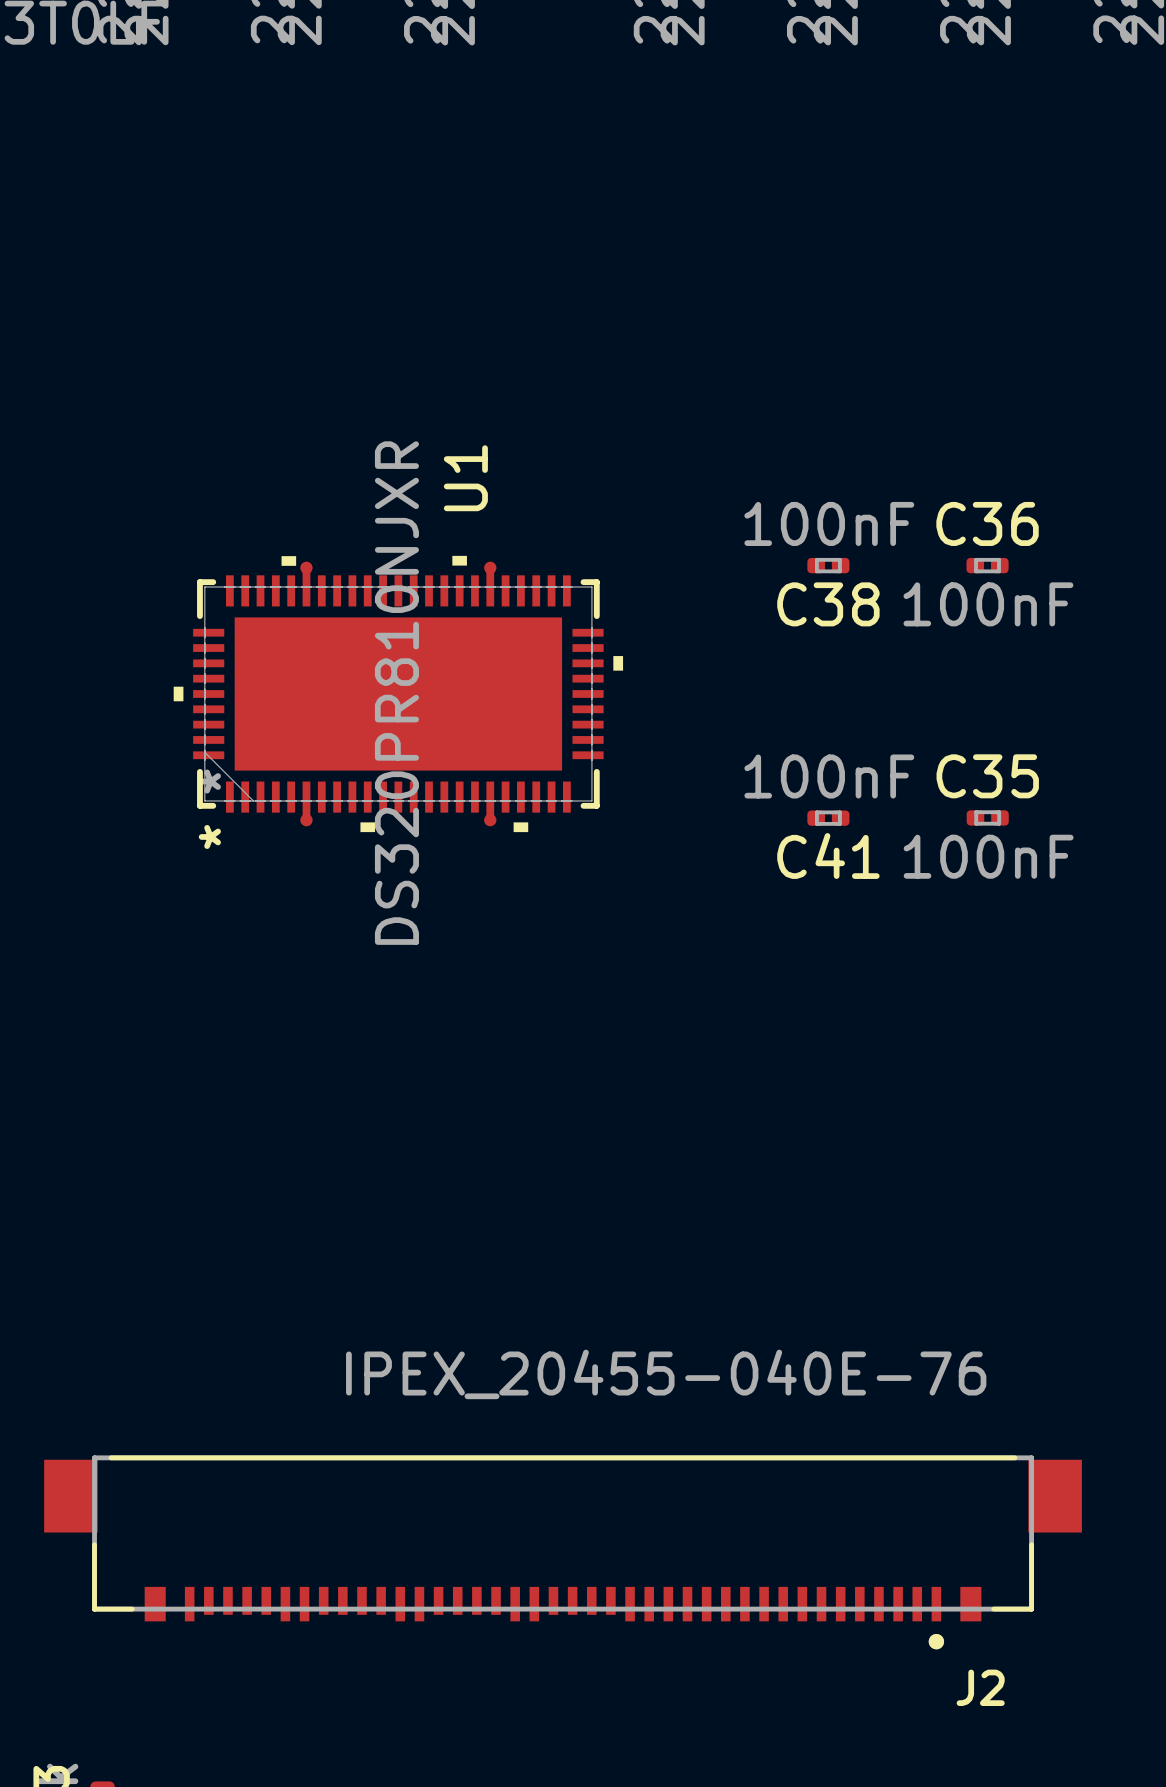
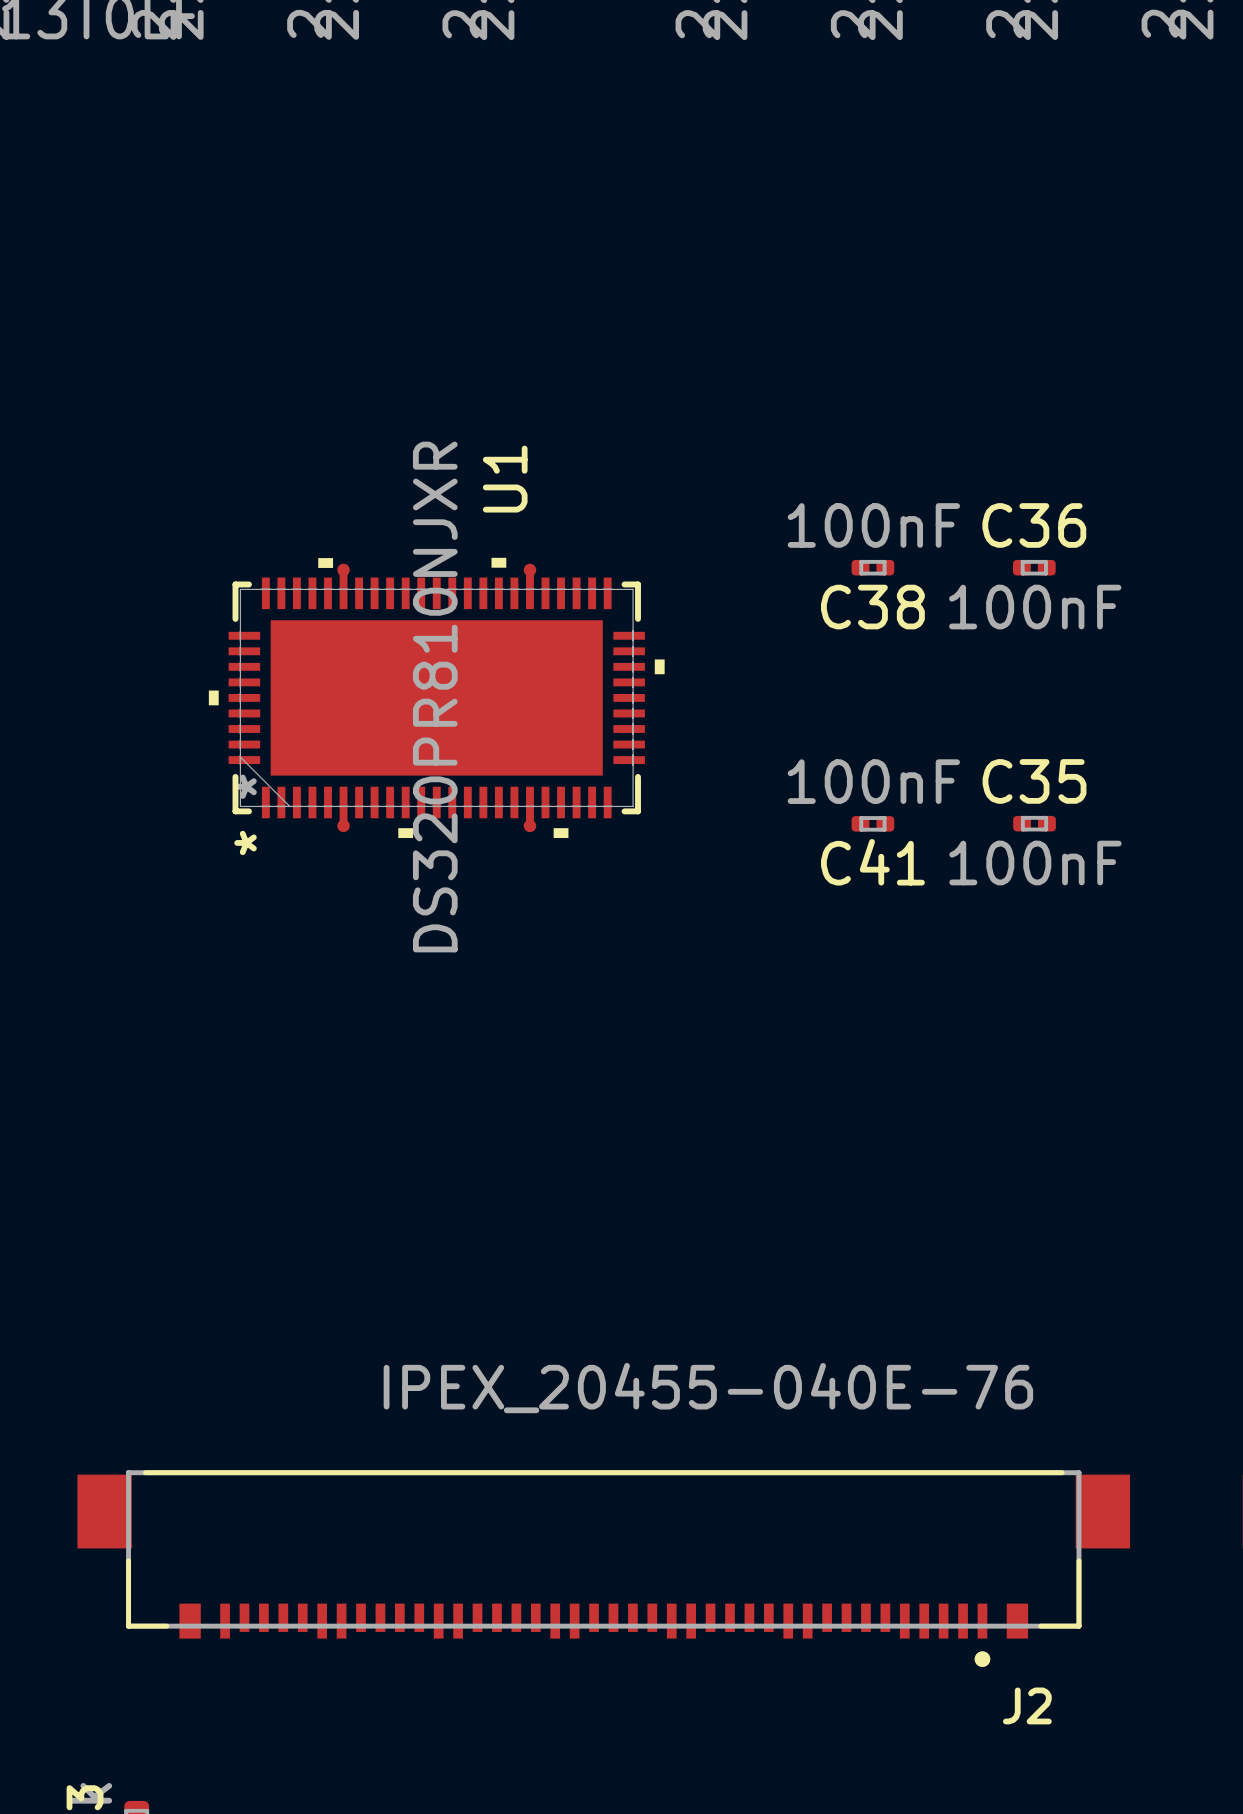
J2 footprint: [44, 1455, 1082, 1650] -> [77, 1470, 1131, 1667]

